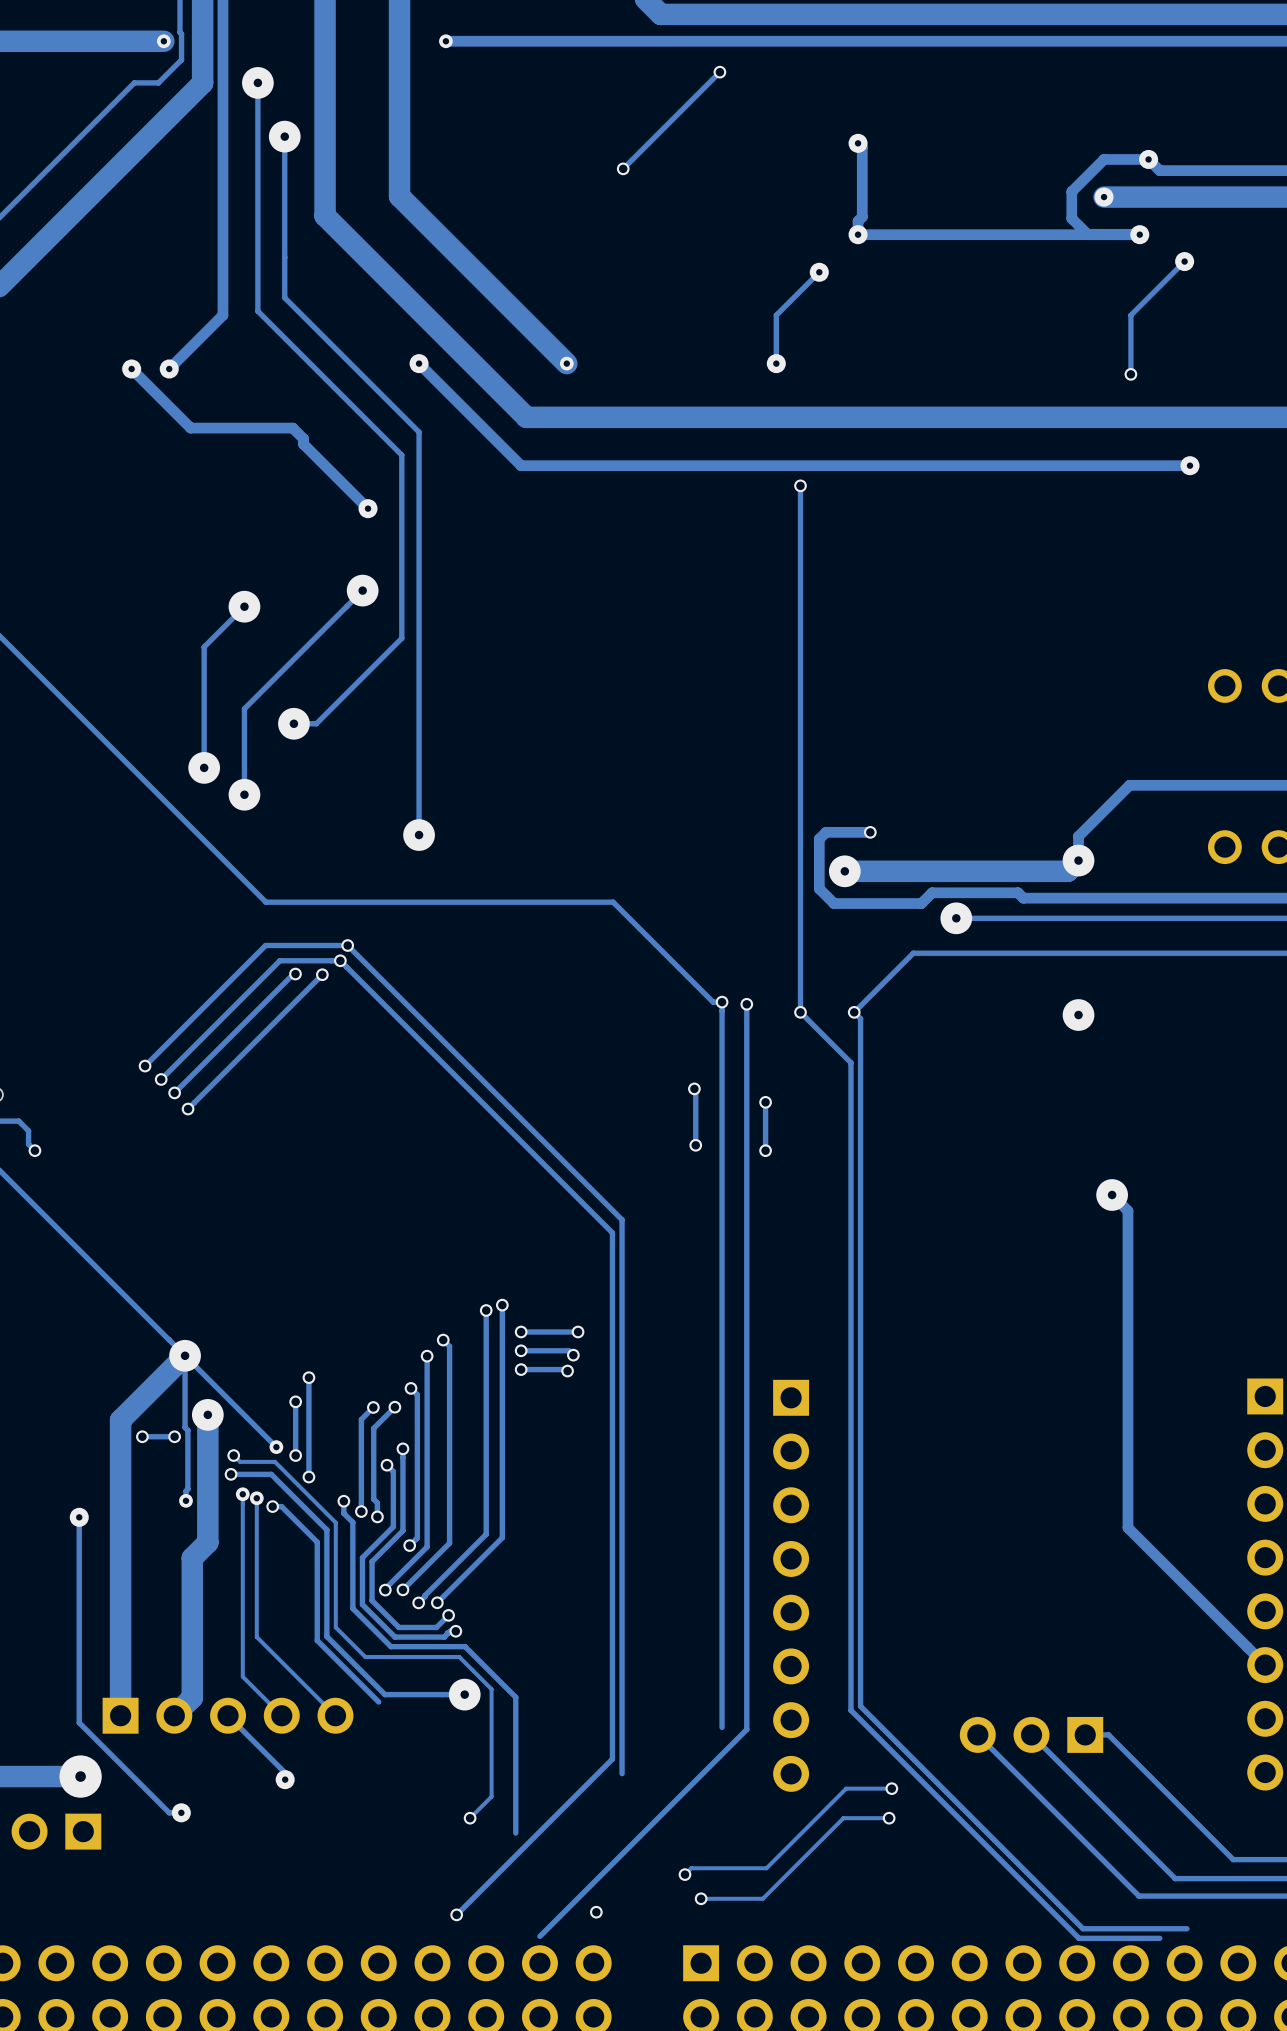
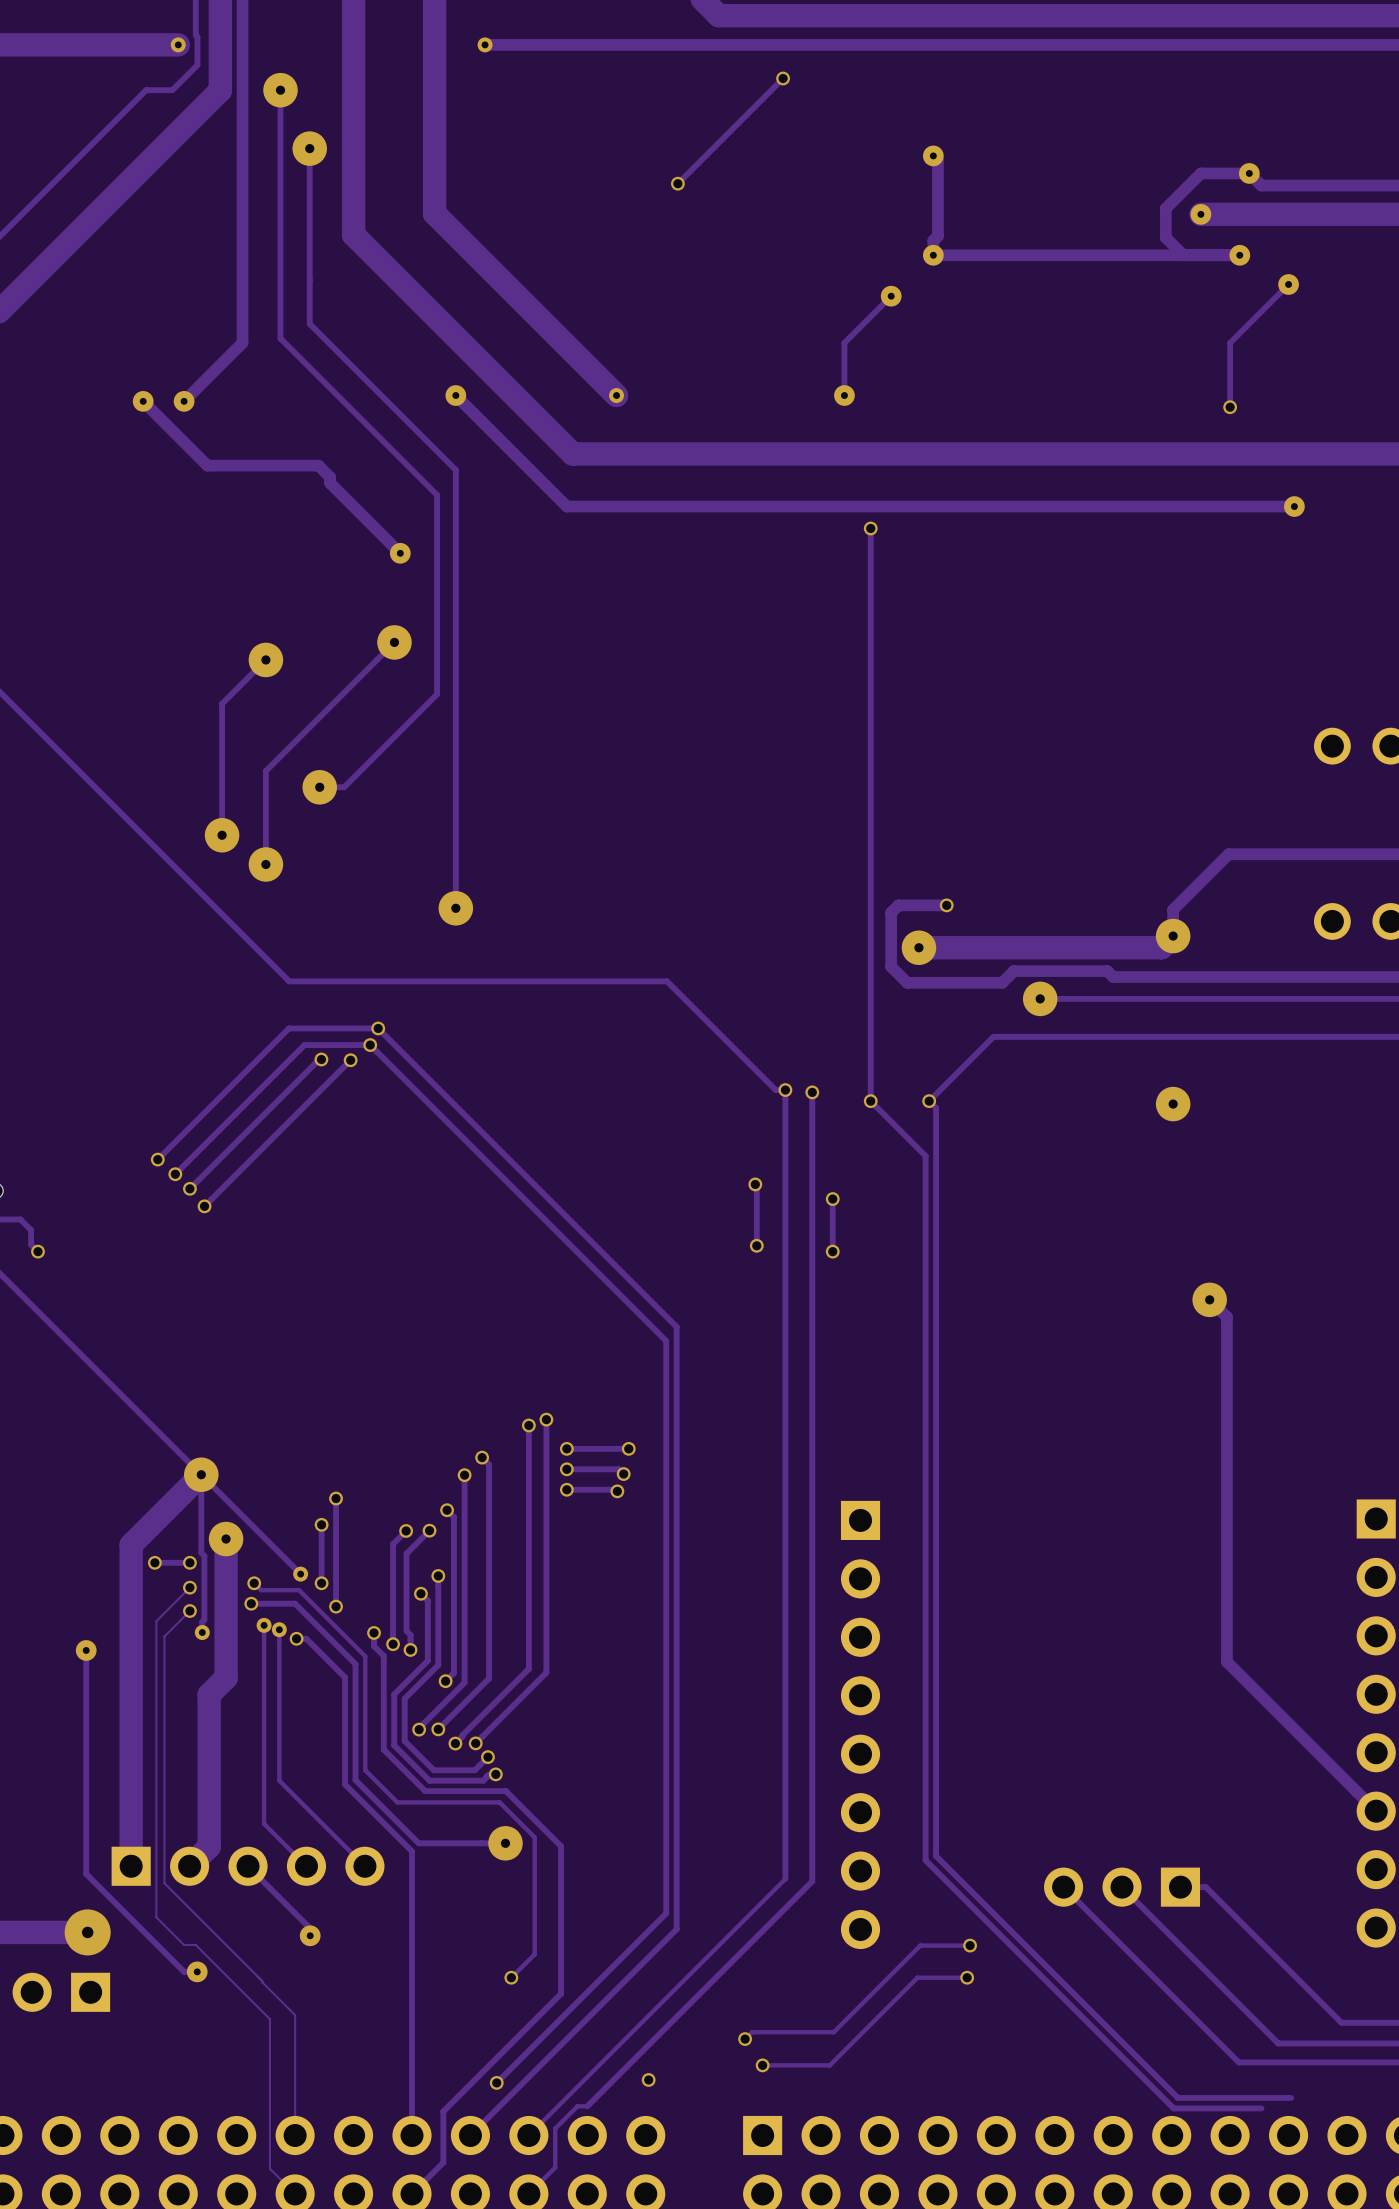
track: none -> (189, 1587) (156, 1621) (156, 1917) (184, 1944) (195, 1944) (269, 2019) (269, 2168) (295, 2193)
via: none -> (189, 1587)
track: none -> (189, 1611) (164, 1636) (164, 1883) (295, 2015) (295, 2135)
via: none -> (189, 1611)
track: none -> (412, 1851) (412, 2135)
track: none -> (785, 1878) (528, 2135)
track: none -> (676, 1929) (470, 2135)
track: none -> (561, 1993) (443, 2111) (443, 2162) (412, 2193)
track: none -> (587, 2106) (577, 2106) (555, 2128) (555, 2167) (528, 2193)

